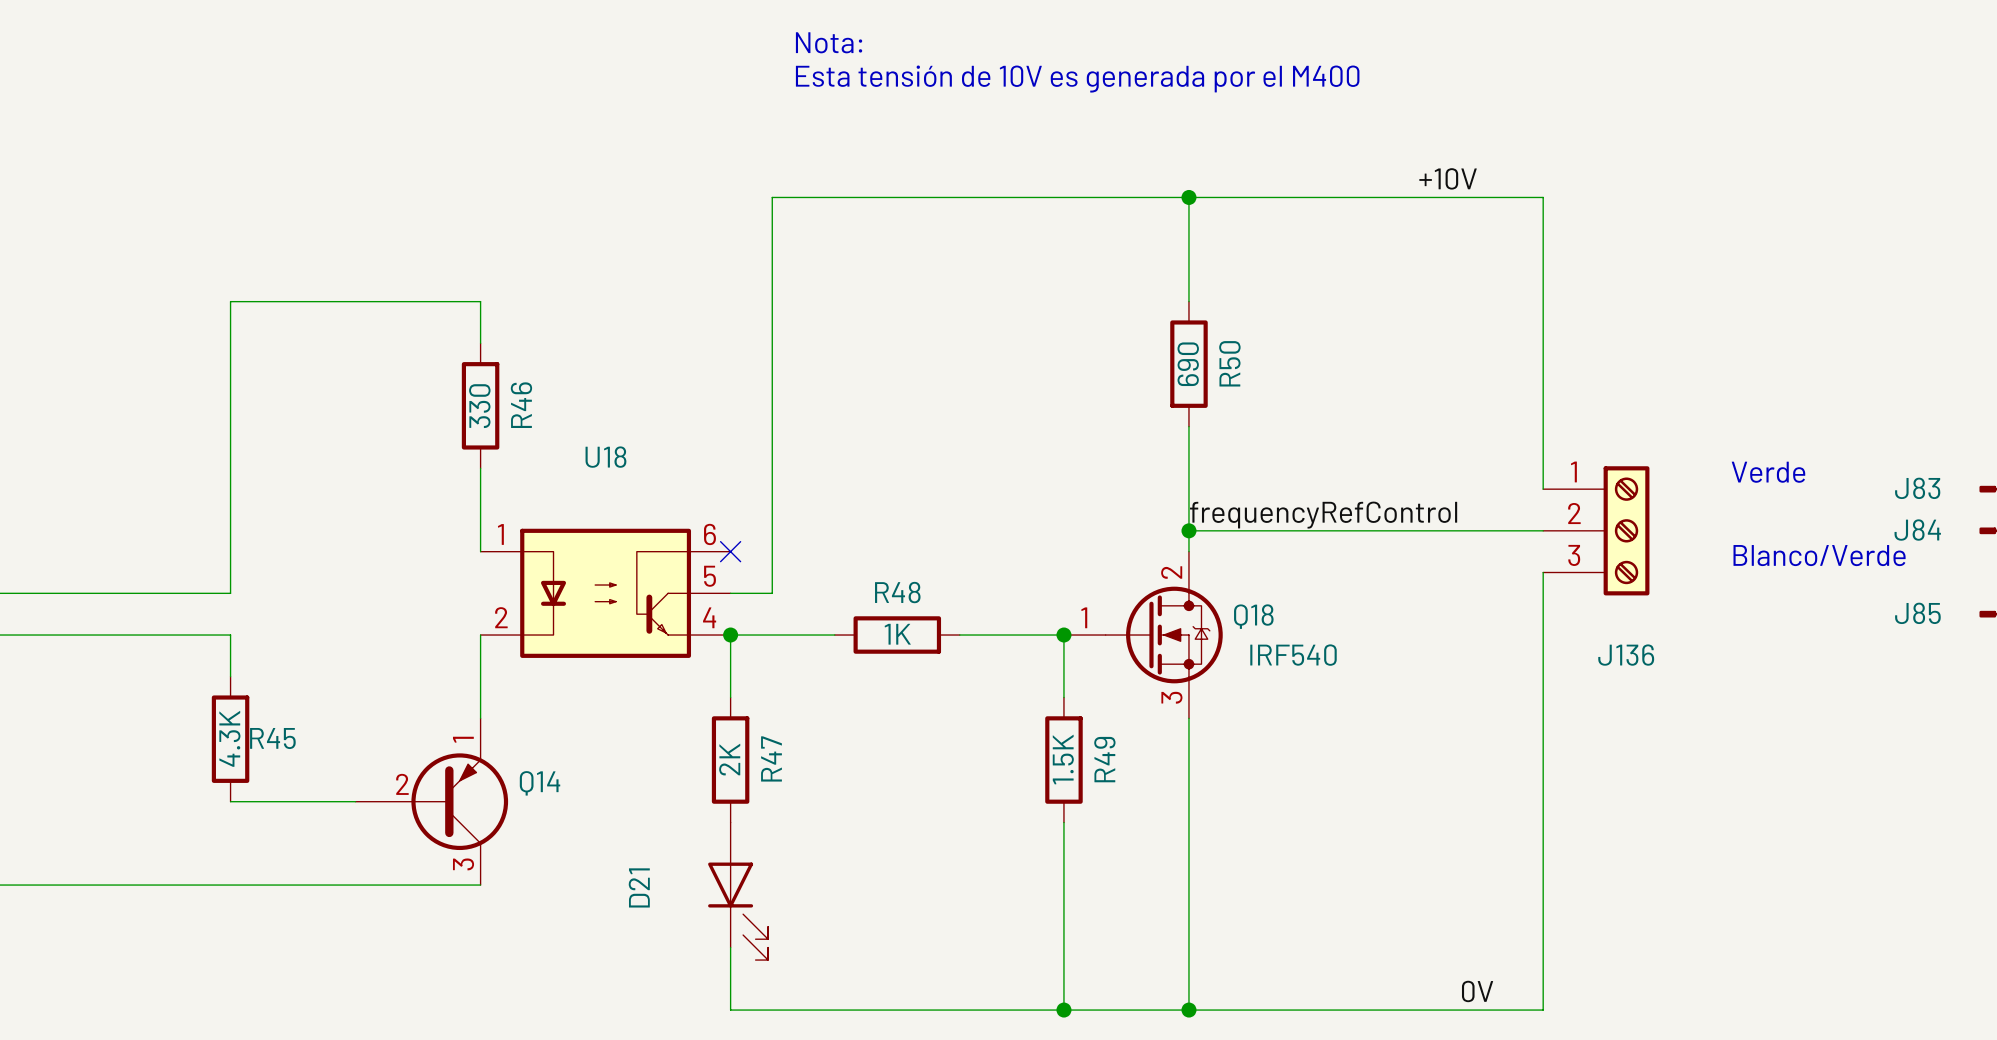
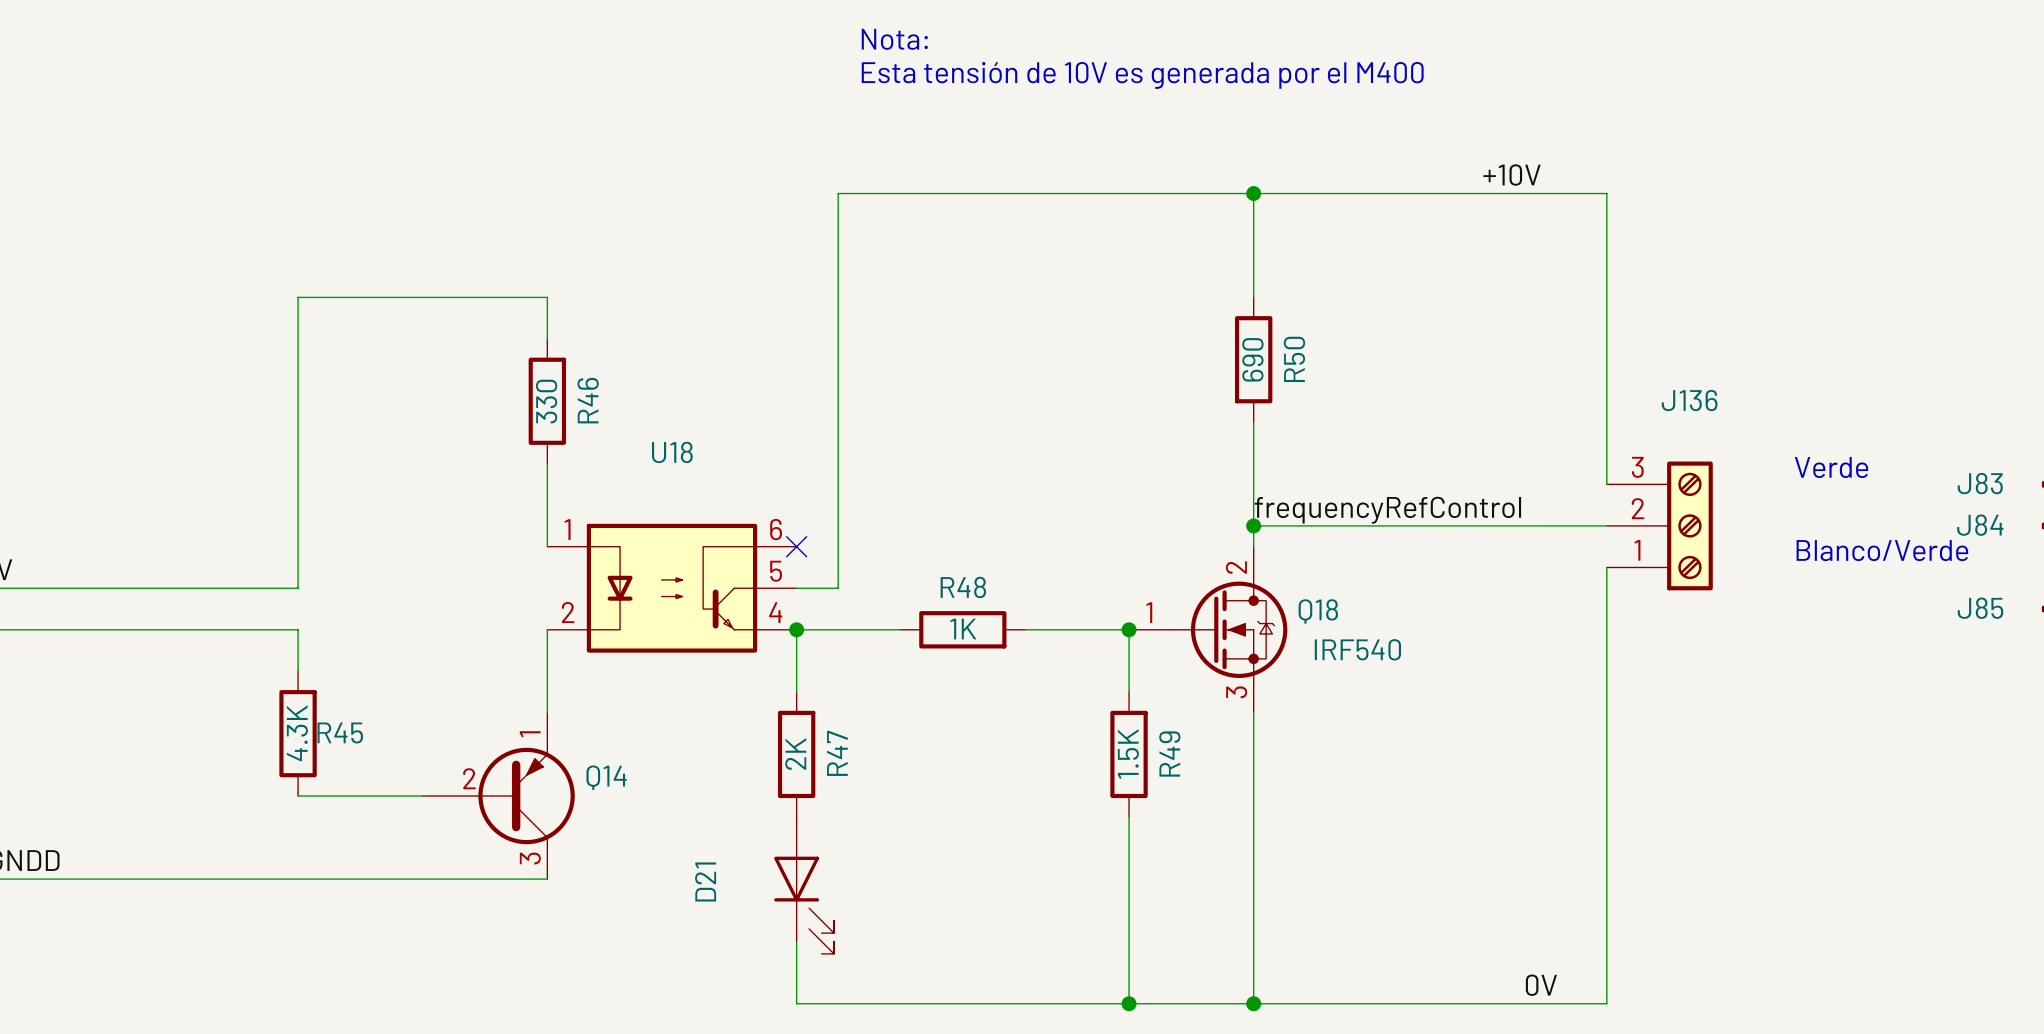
J136 flip: as is (1626, 530) -> up-down (1689, 525)

